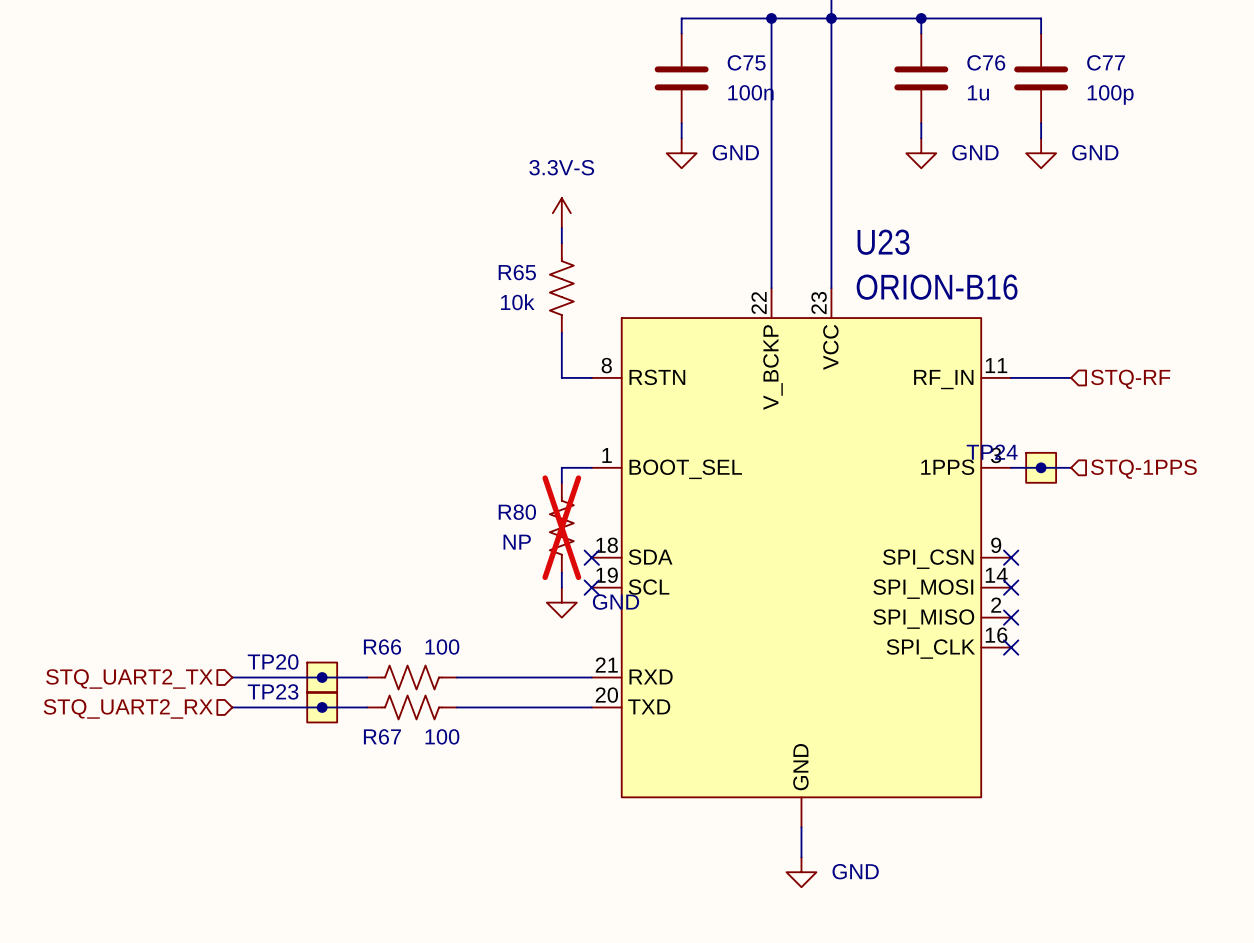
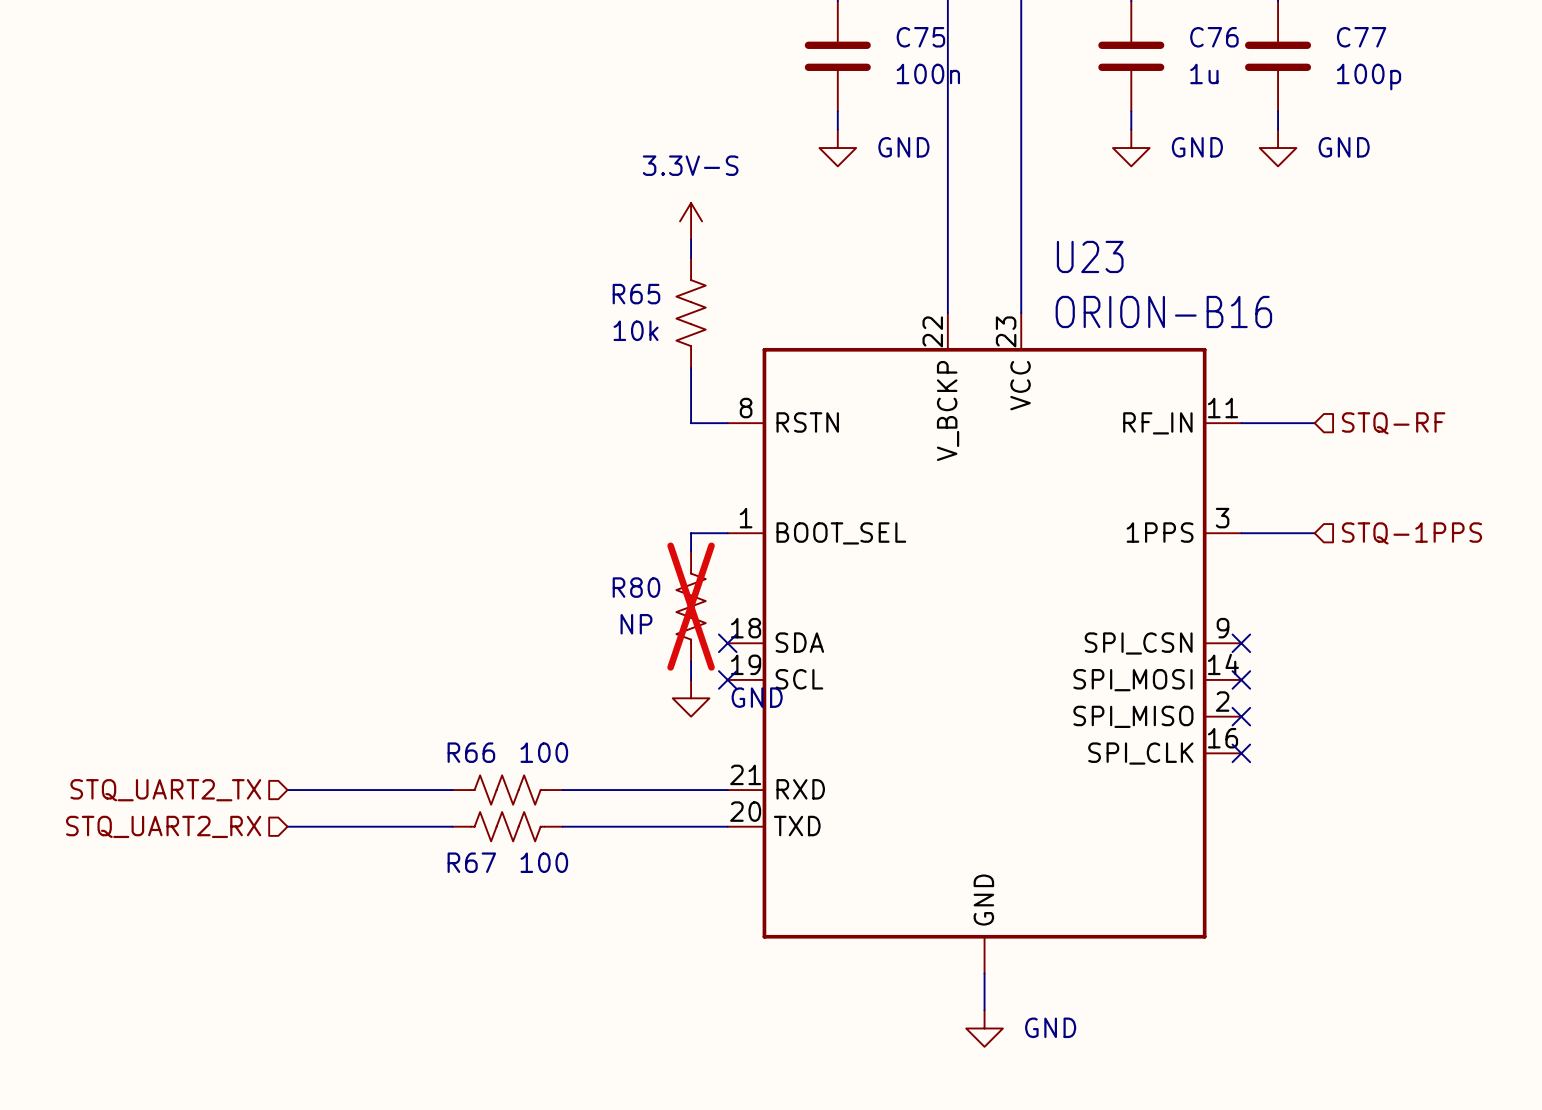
U23 symbol: [591, 288, 1012, 828] -> [727, 313, 1242, 974]
junction: (1041, 467) -> none
TP24: (1041, 467) -> none
junction: (322, 677) -> none
TP20: (322, 677) -> none
junction: (322, 707) -> none
TP23: (322, 707) -> none

